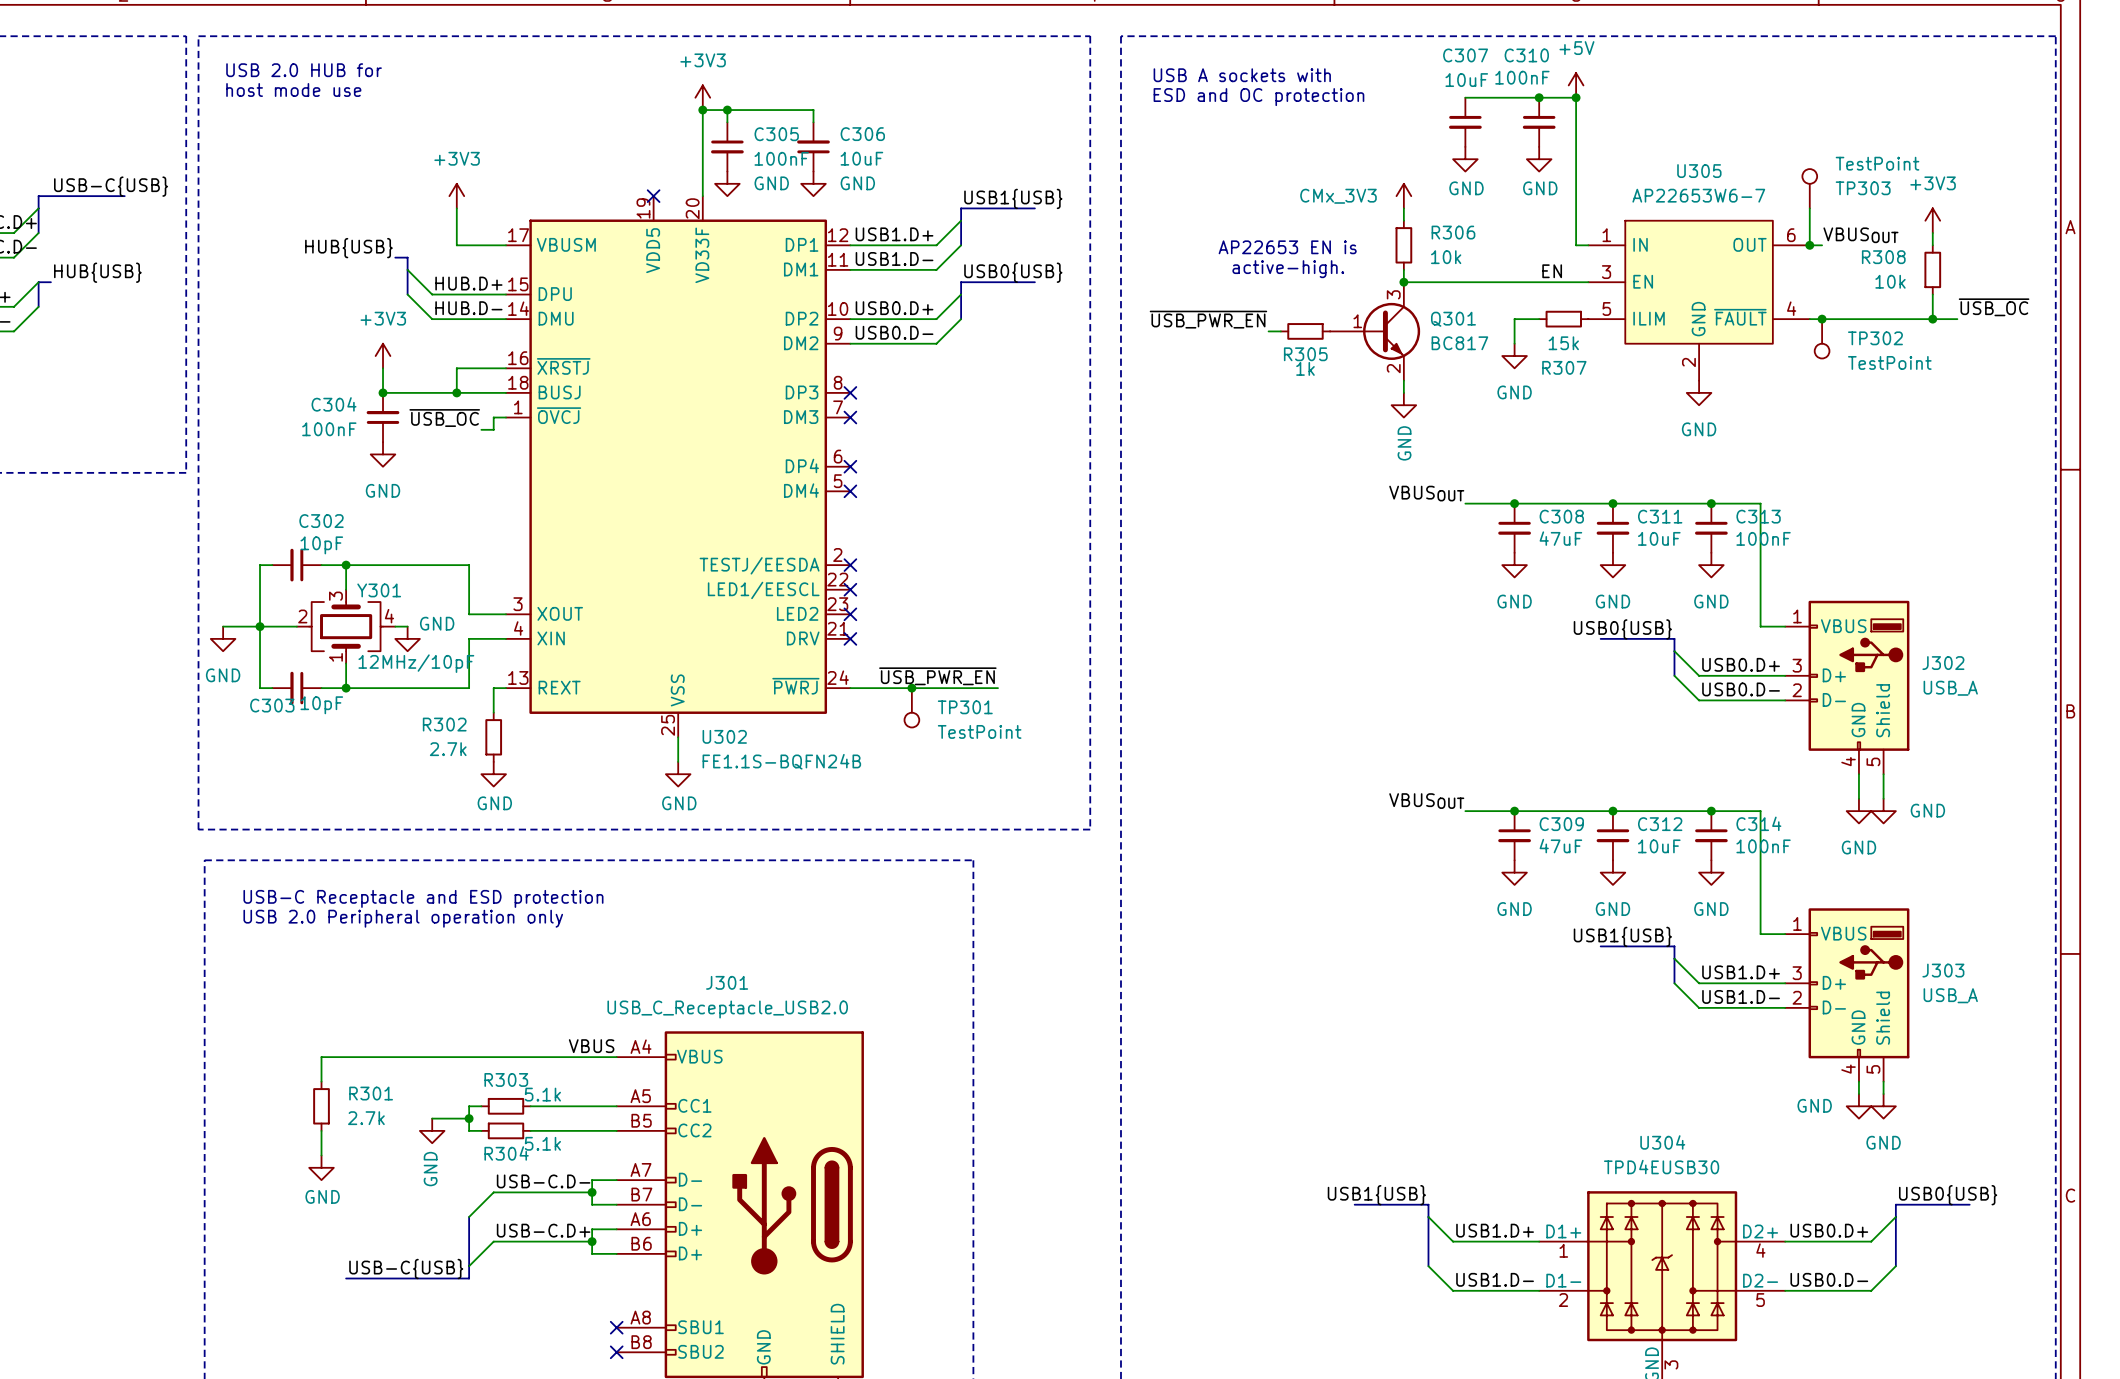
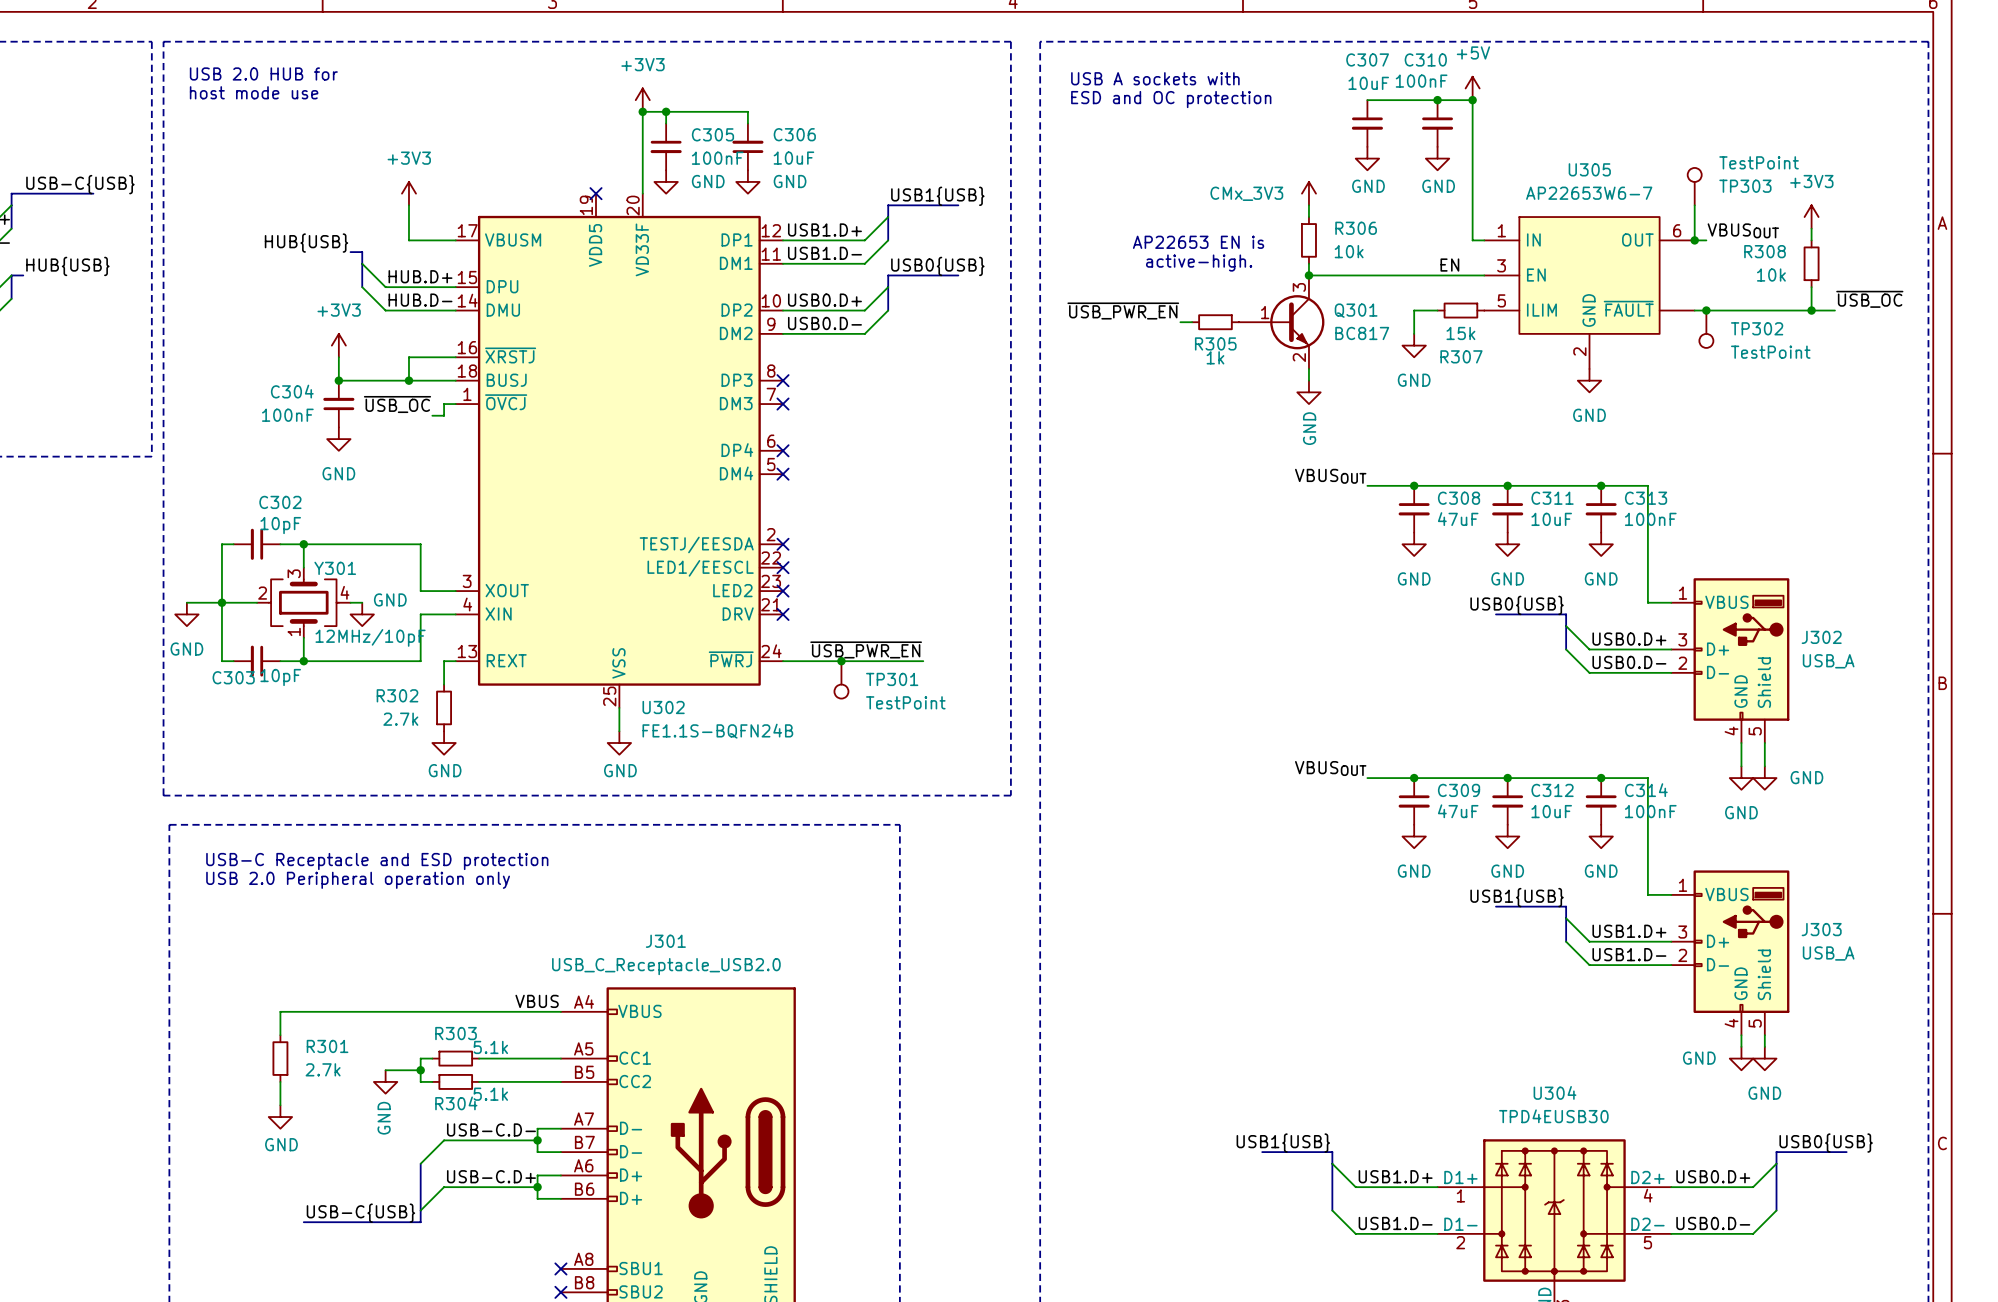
U305 pin number: 4 (1791, 308) -> none

